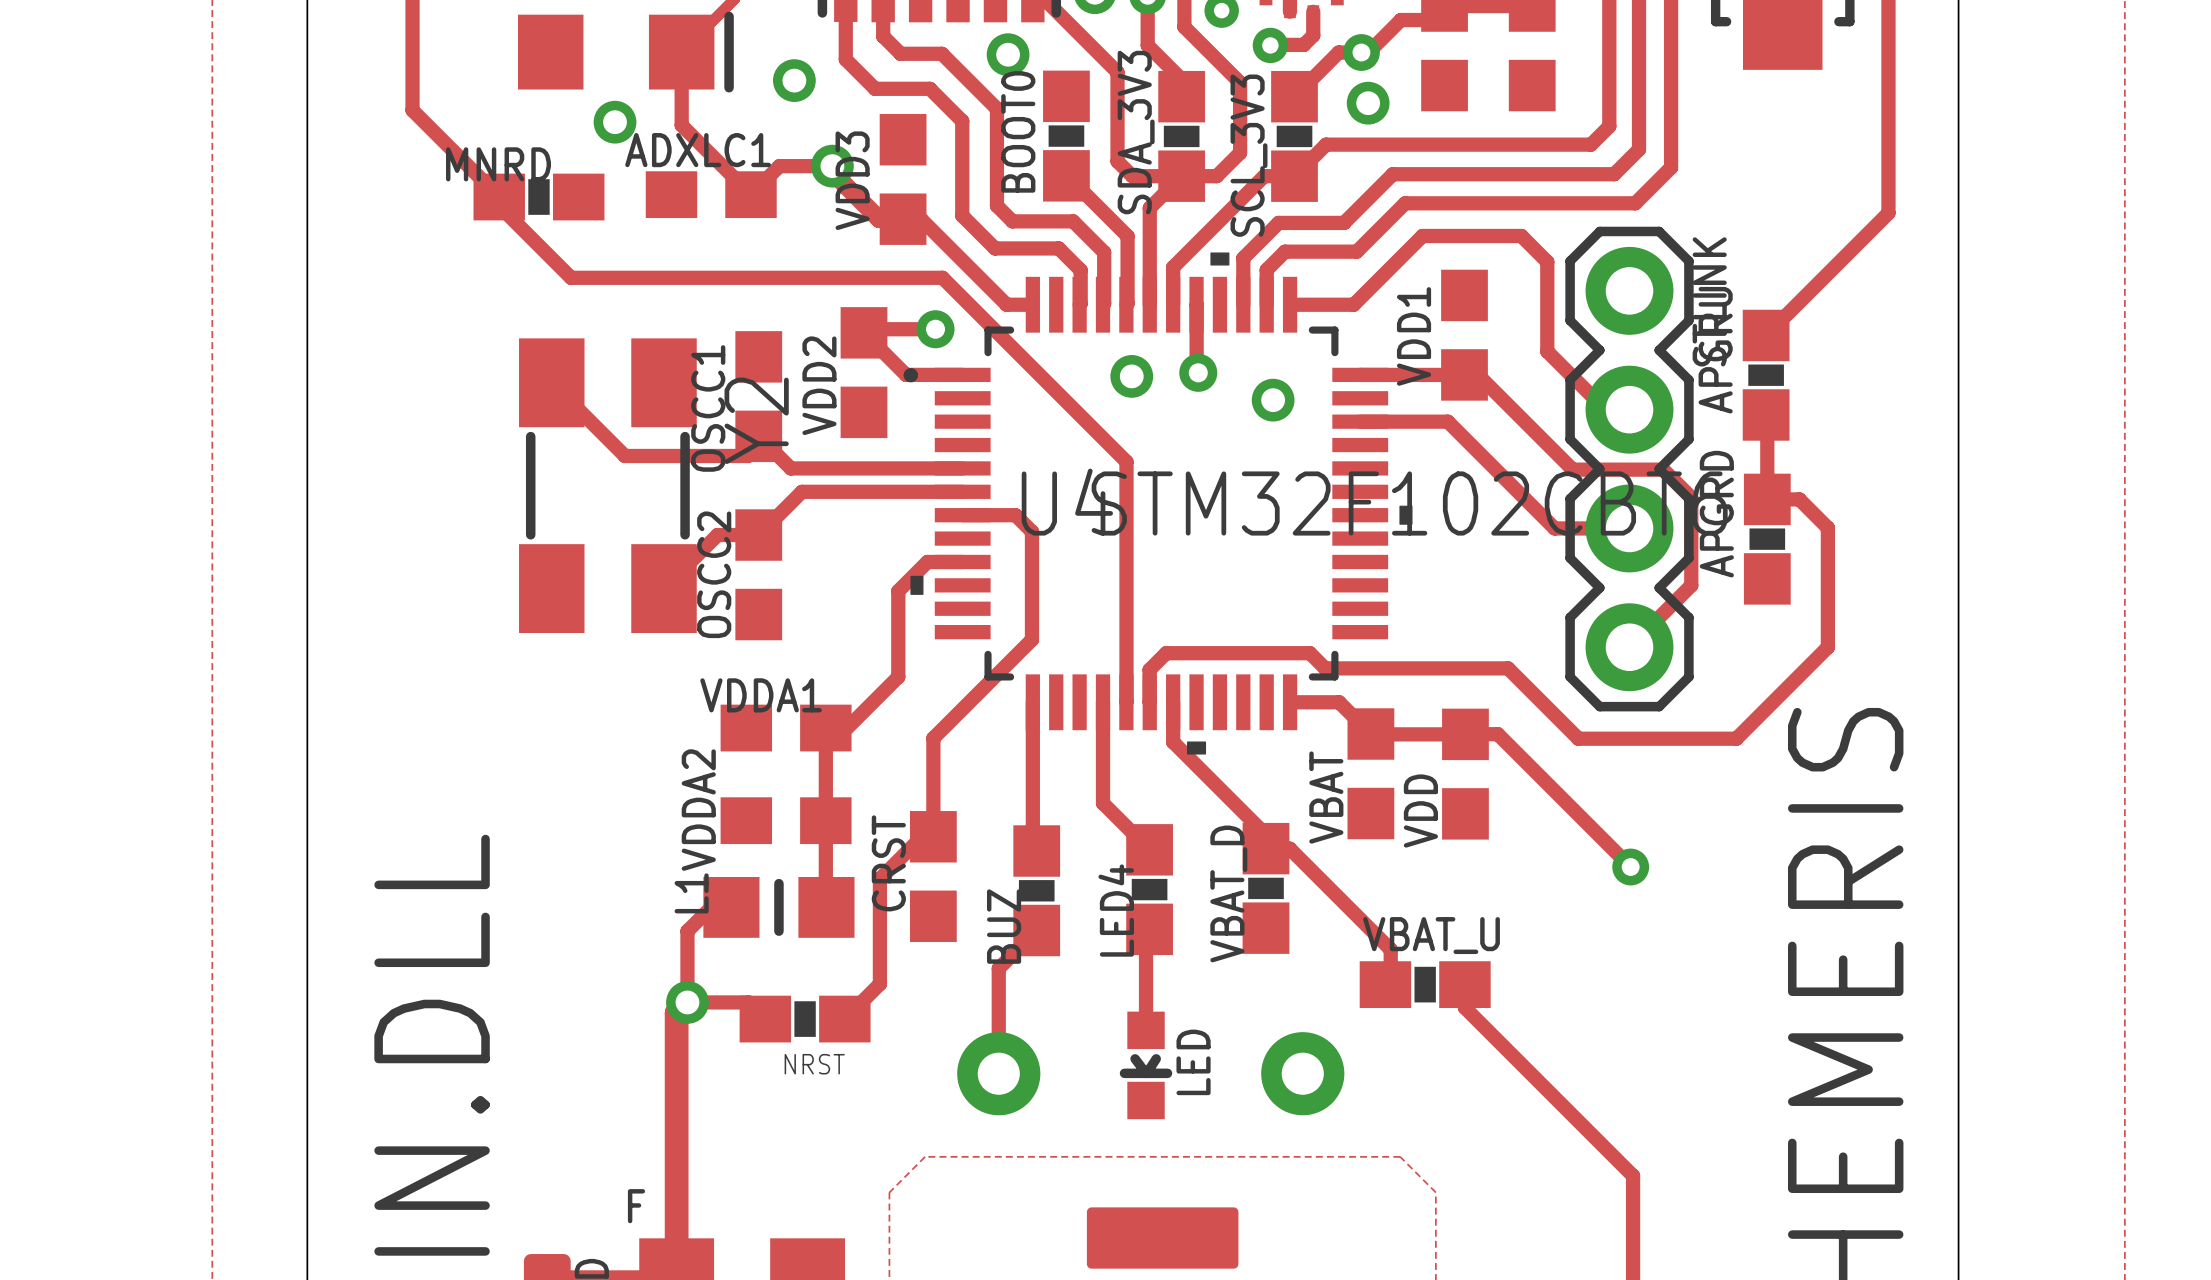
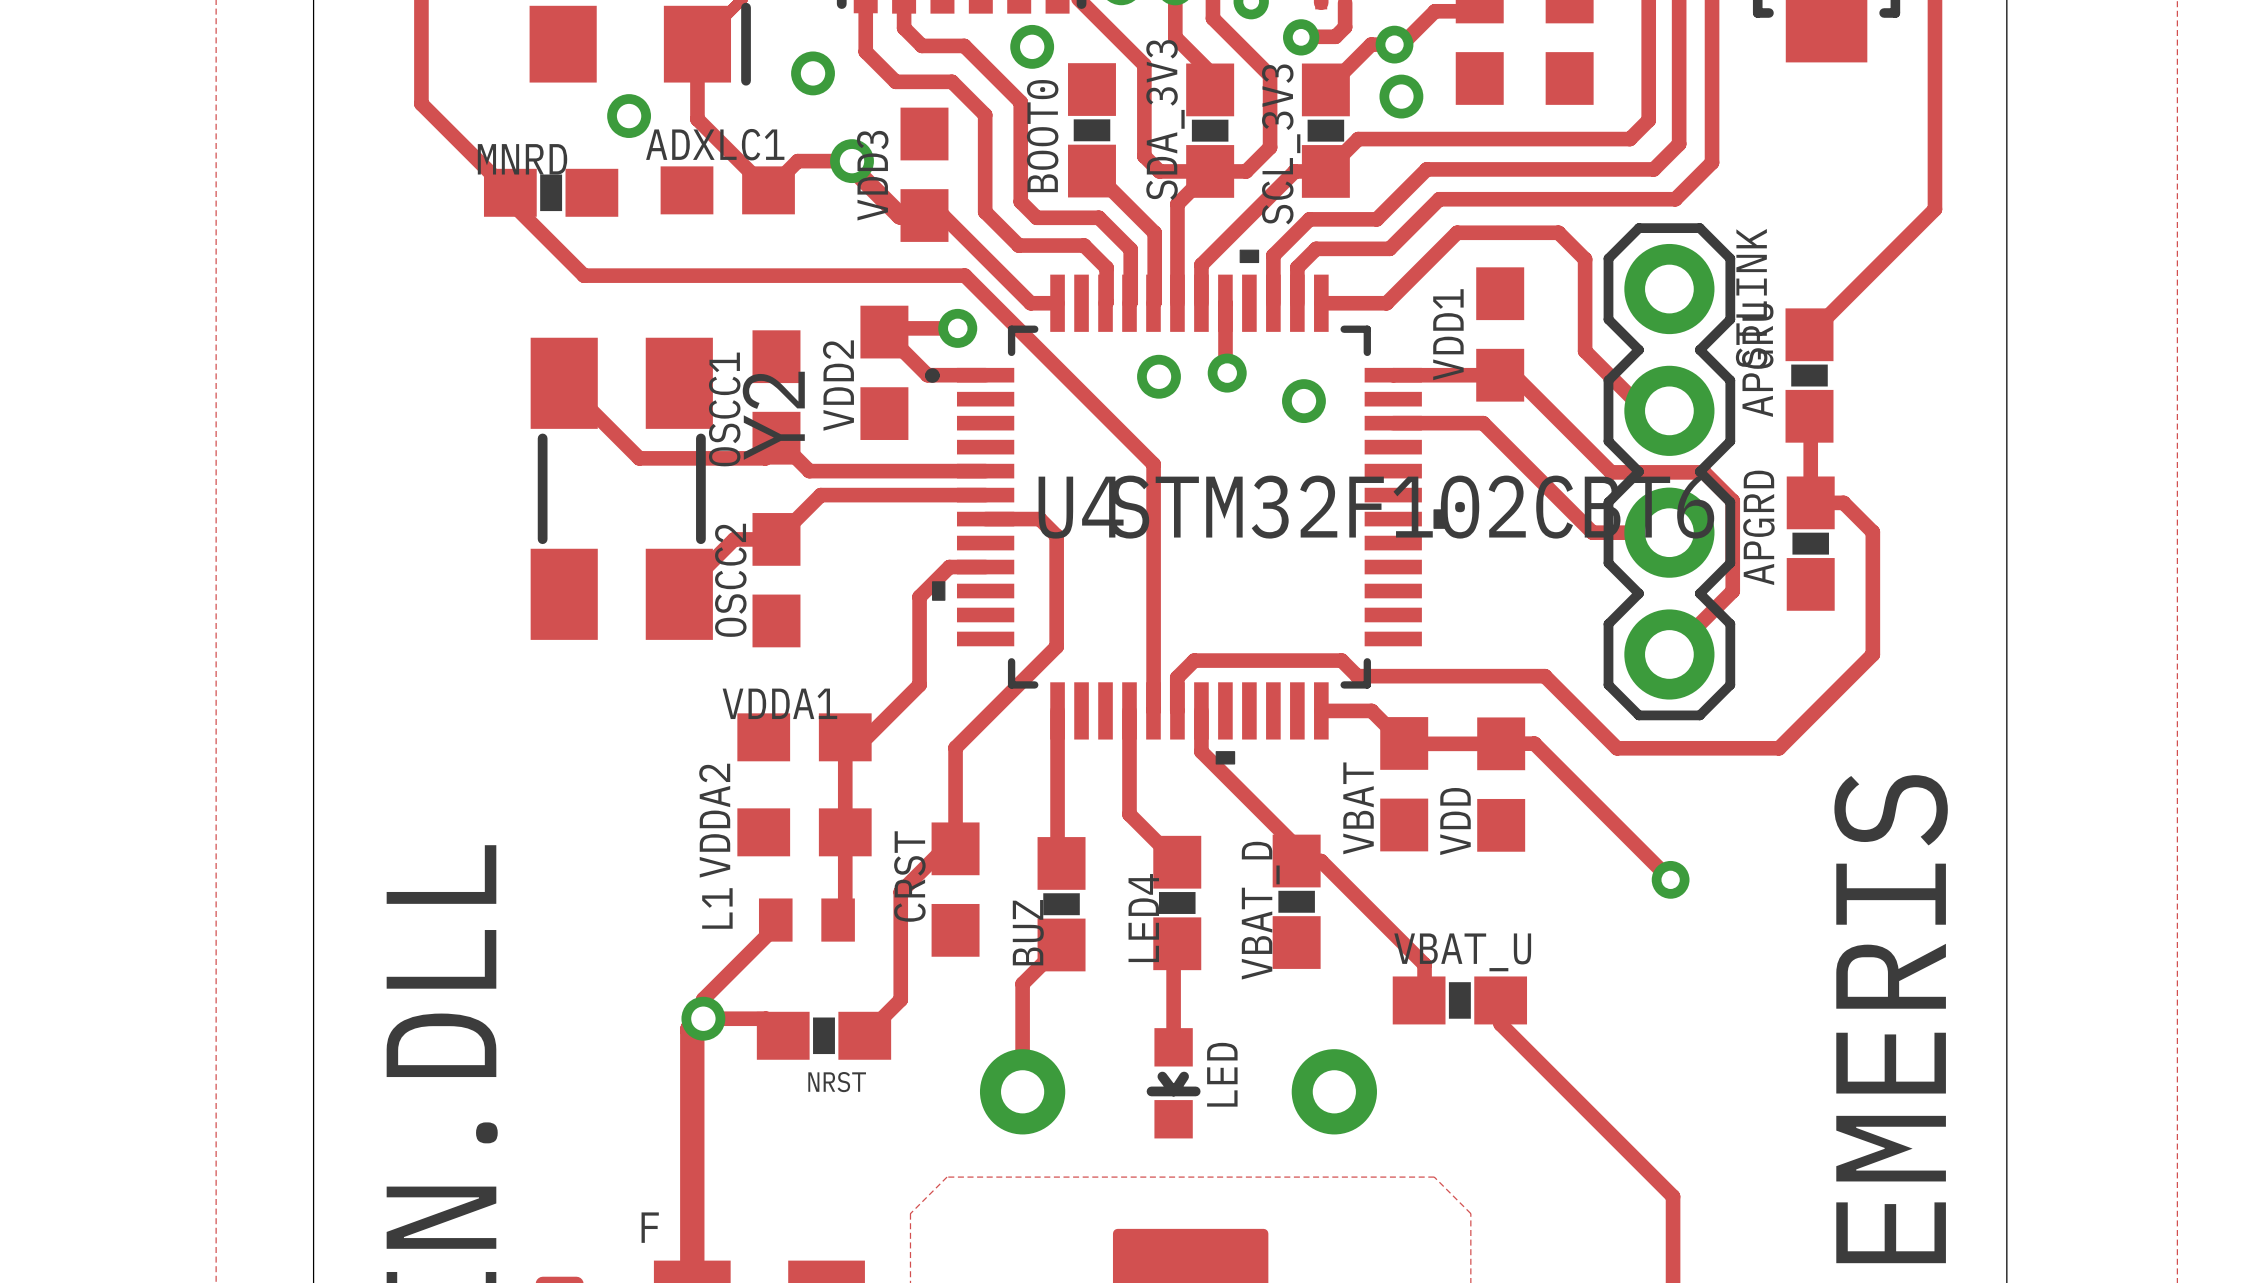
L1 footprint: [703, 877, 855, 938] -> [758, 898, 855, 942]
track: (731, 907) (711, 907) (687, 931) (687, 983) -> (775, 920) (775, 926) (703, 999)

